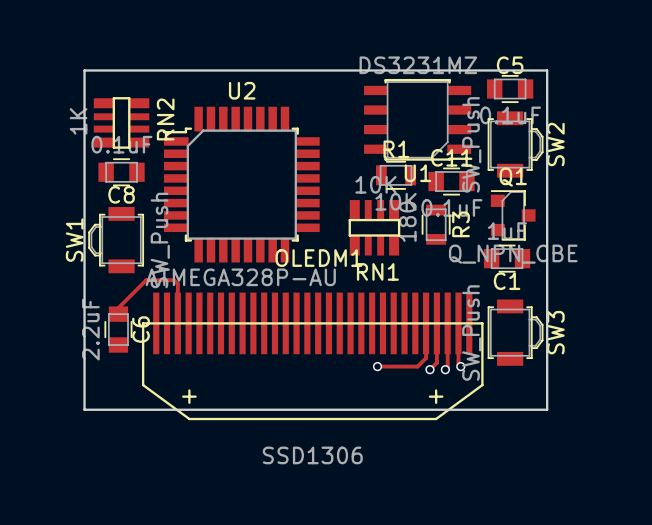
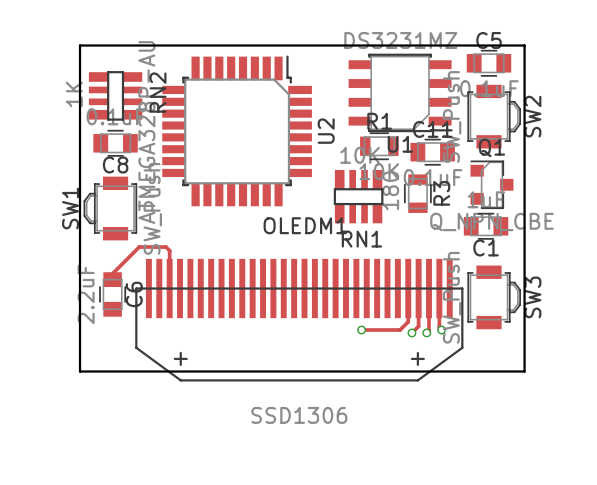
U2 rotation: 0° (241, 184) -> 90° clockwise (237, 130)

